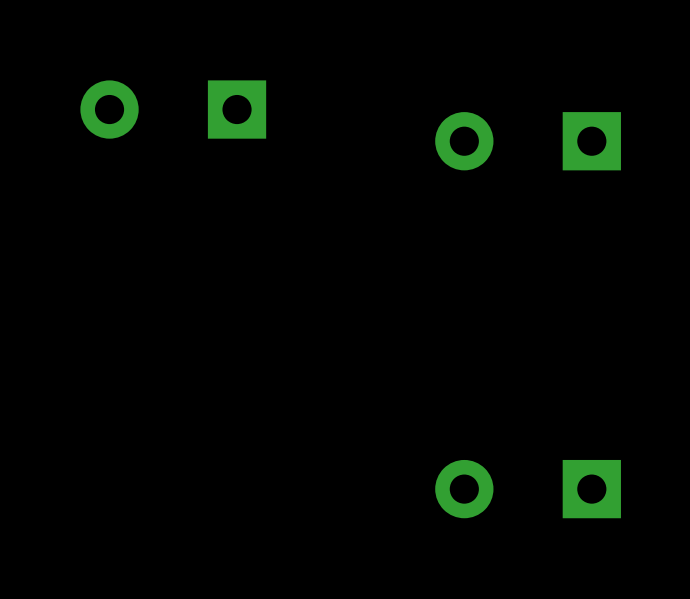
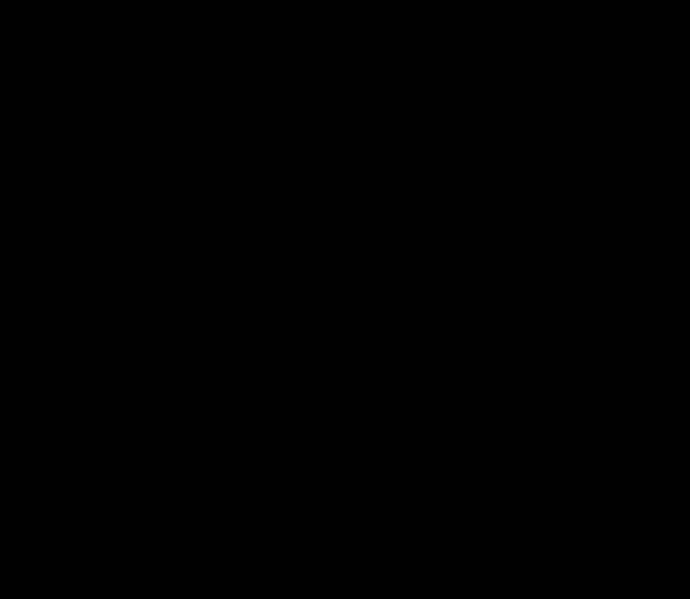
part: (173, 109) -> none
part: (528, 141) -> none
part: (528, 489) -> none

